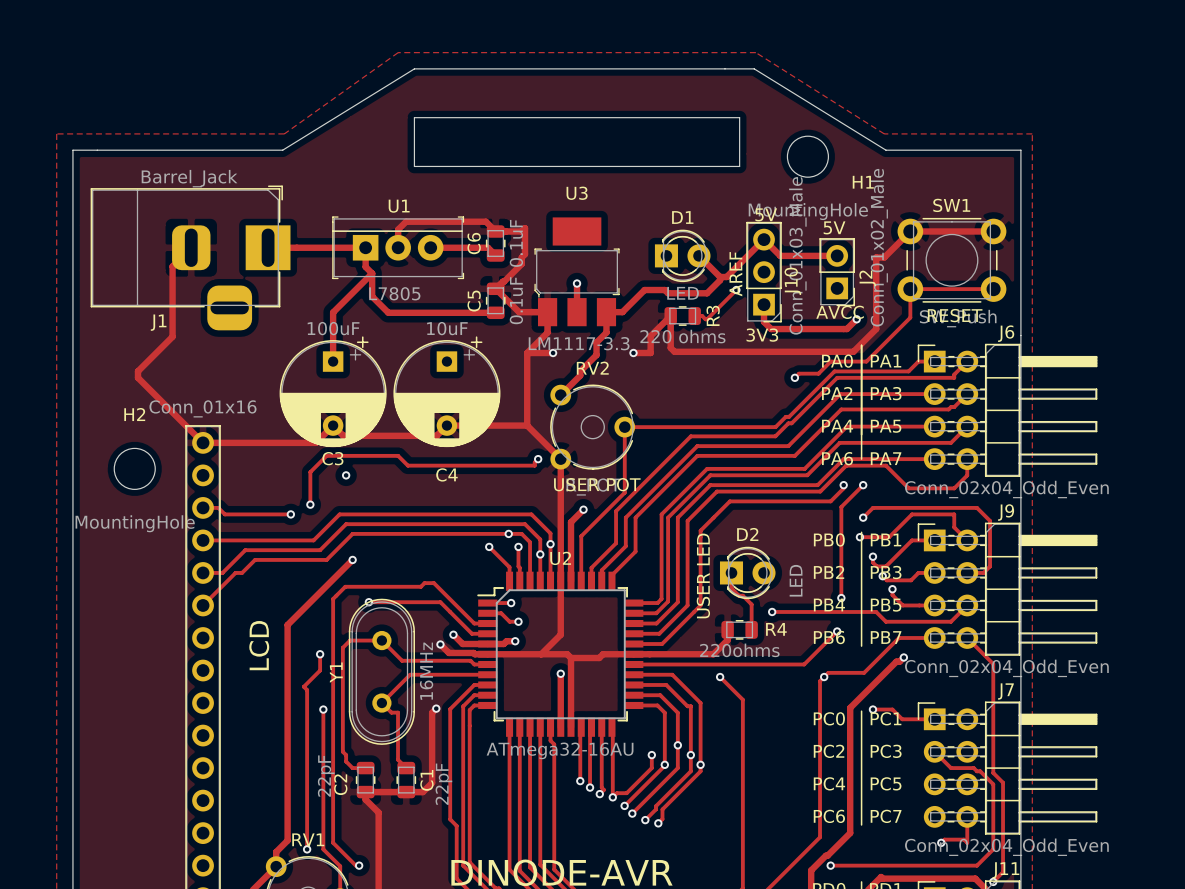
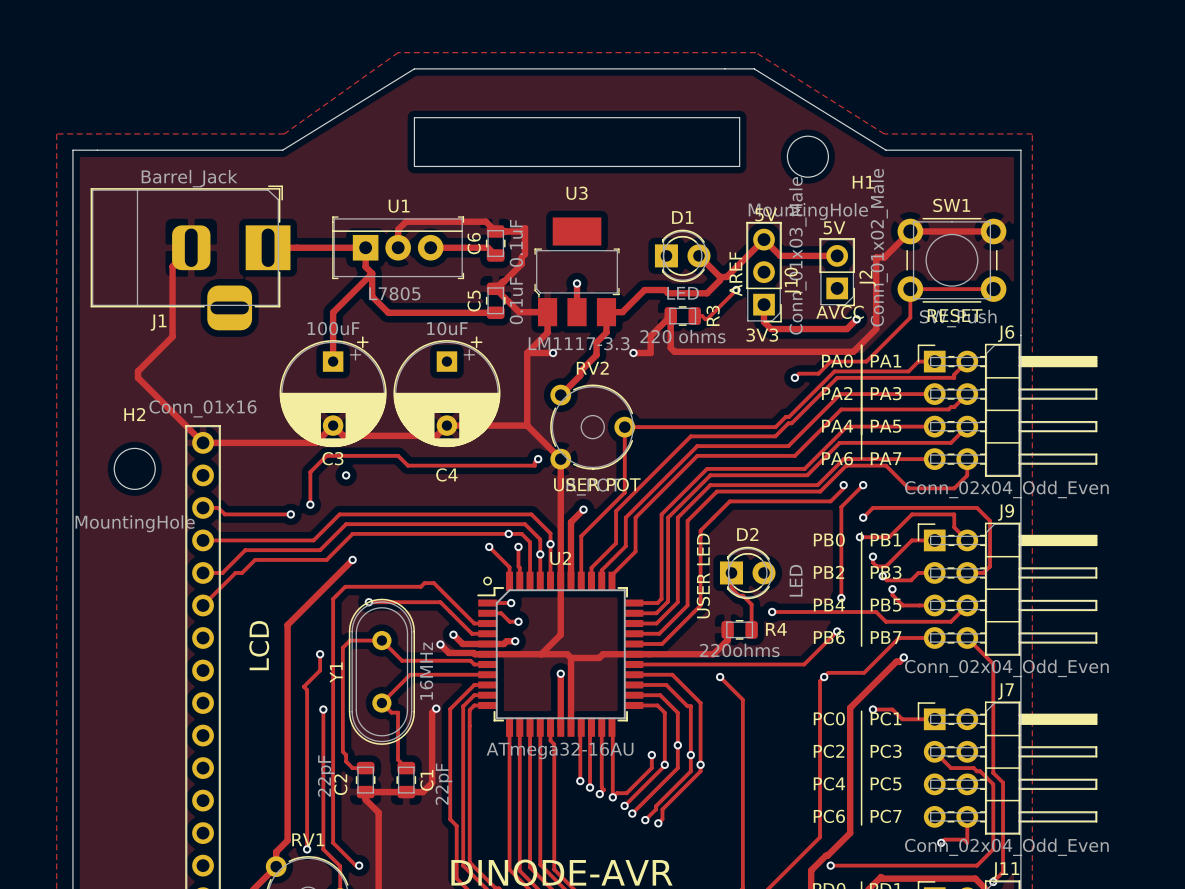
drawing: none -> [483, 576, 493, 586]

